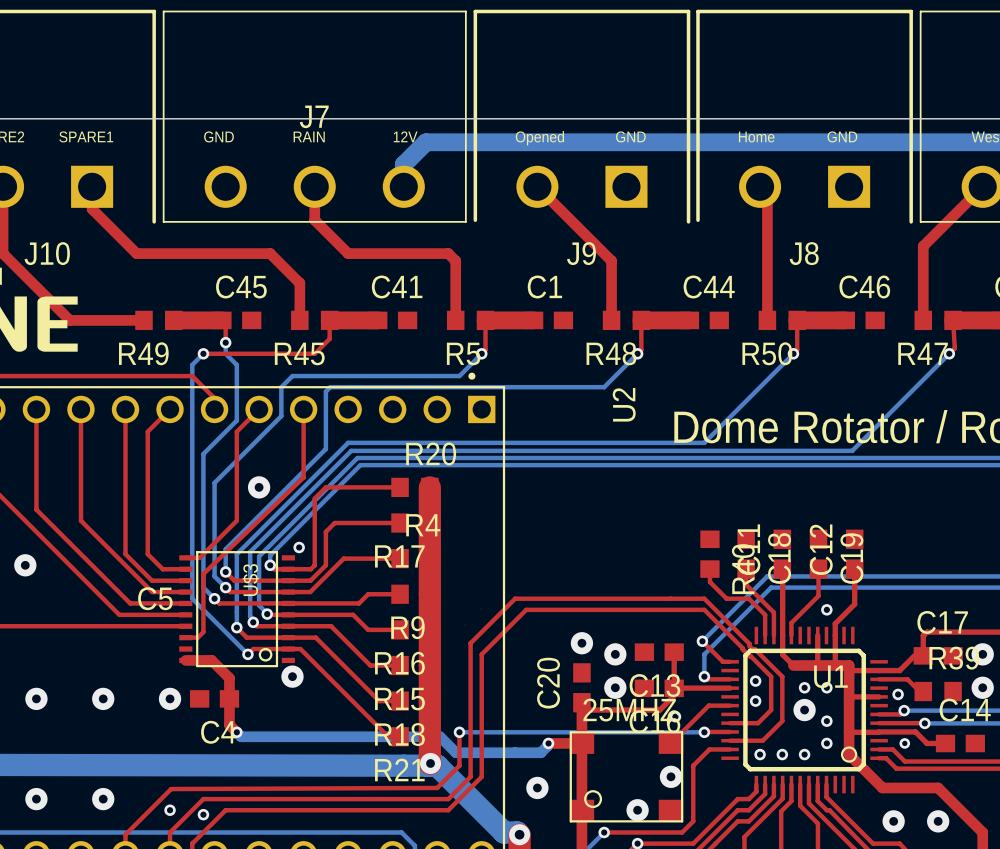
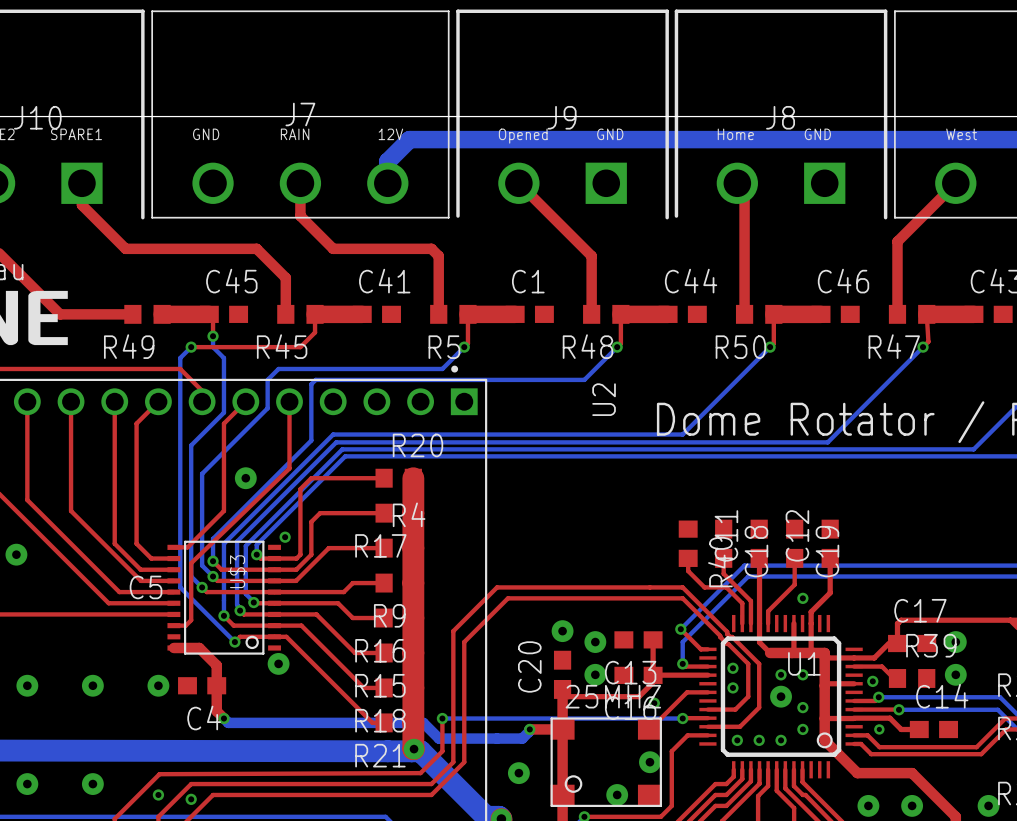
J10 name position: J10 (47, 253) -> J10 (37, 117)
J9 name position: J9 (581, 253) -> J9 (562, 117)
J8 name position: J8 (804, 253) -> J8 (780, 117)

